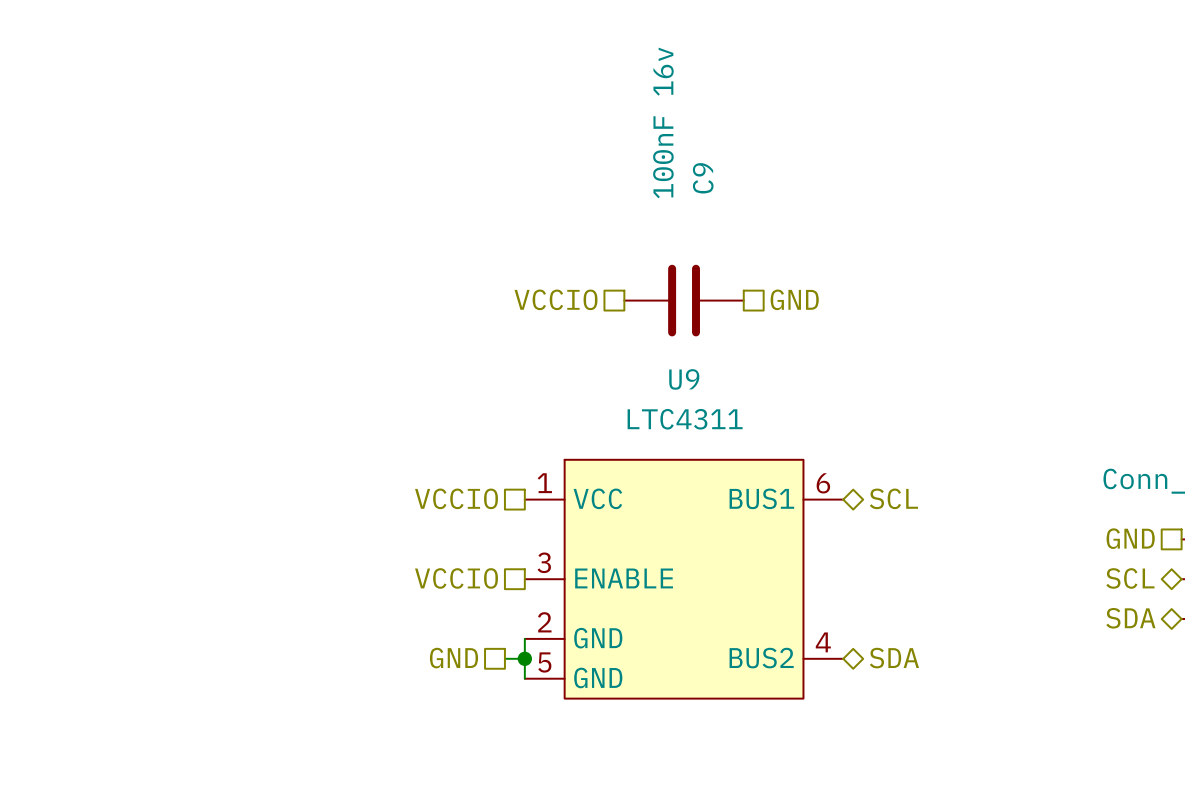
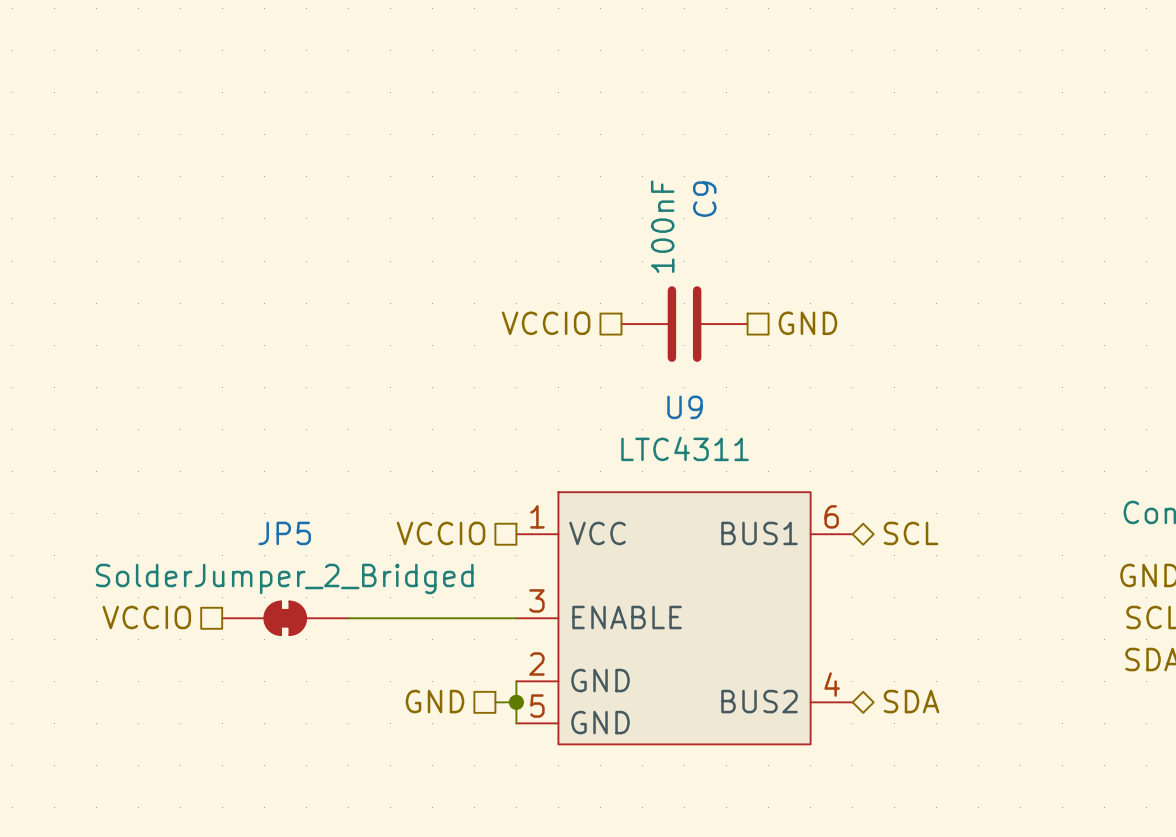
C9 value: 100nF 16v (663, 122) -> 100nF (662, 226)
hierarchical label position: VCCIO (456, 578) -> VCCIO (146, 617)
JP5: none -> SolderJumper_2_Bridged (285, 618)
wire: none -> (348, 618) (516, 618)

